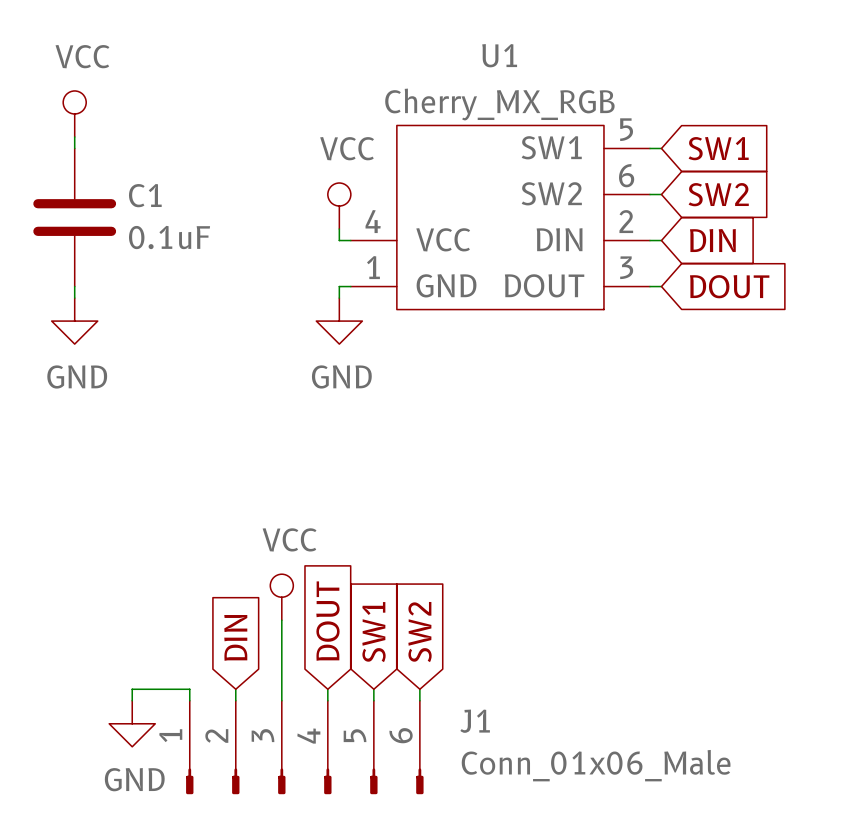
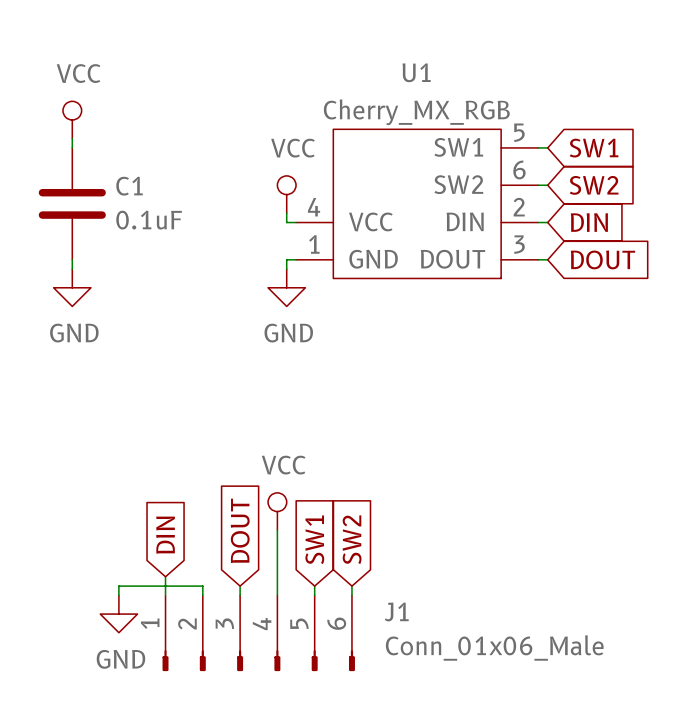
power symbol position: VCC (281, 597) -> VCC (277, 511)
wire: (281, 620) (281, 689) -> (277, 530) (277, 586)
global label position: DOUT (327, 621) -> DOUT (240, 530)
global label position: DIN (235, 637) -> DIN (165, 535)
wire: none -> (165, 576) (165, 586) (202, 586)

